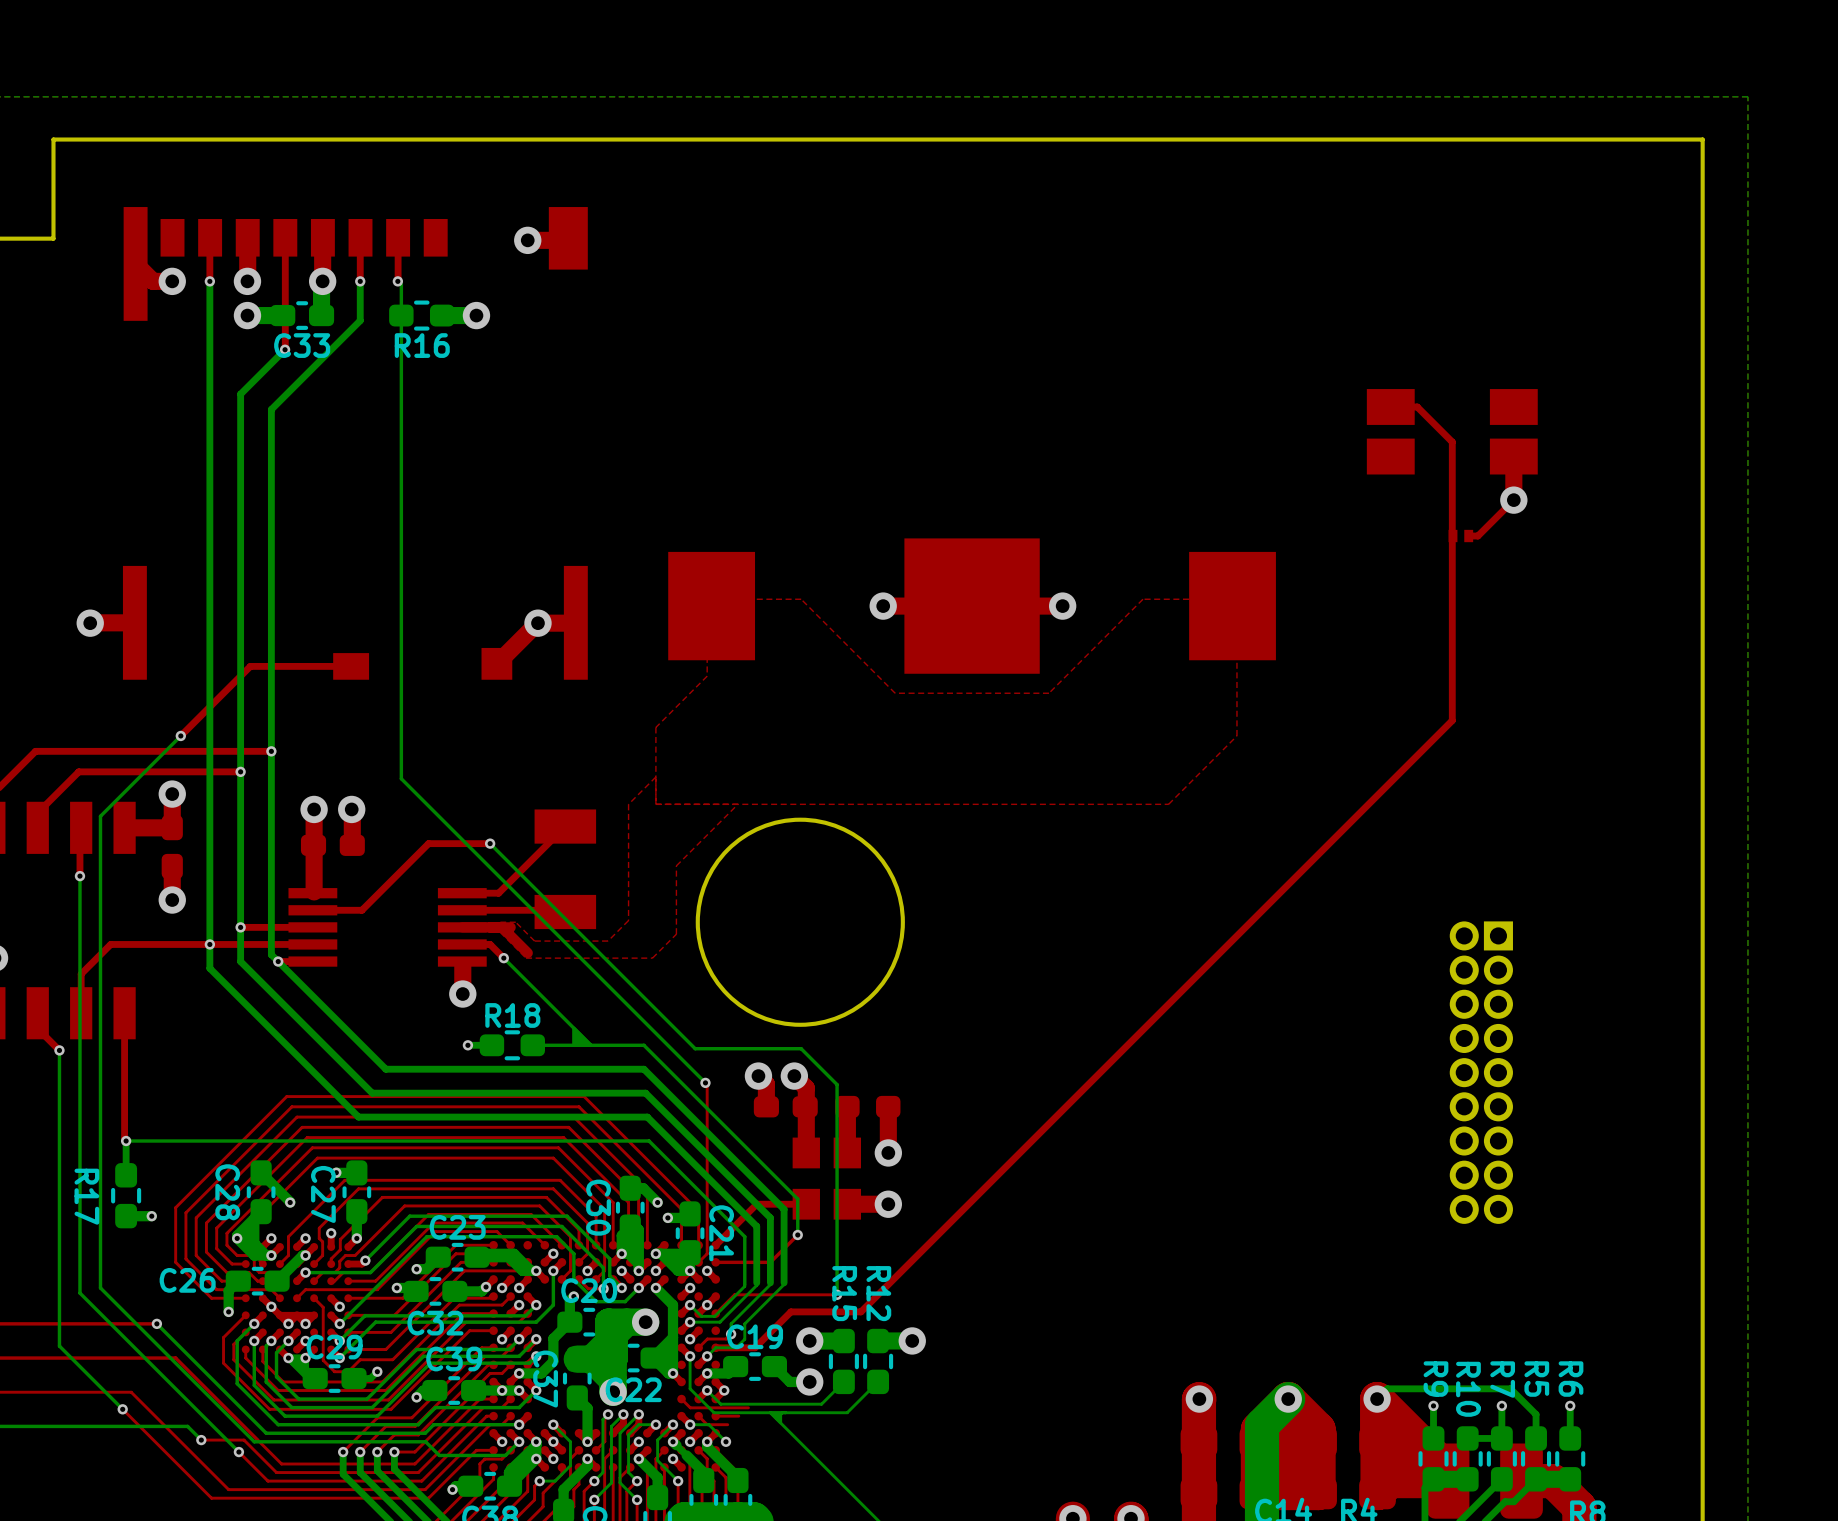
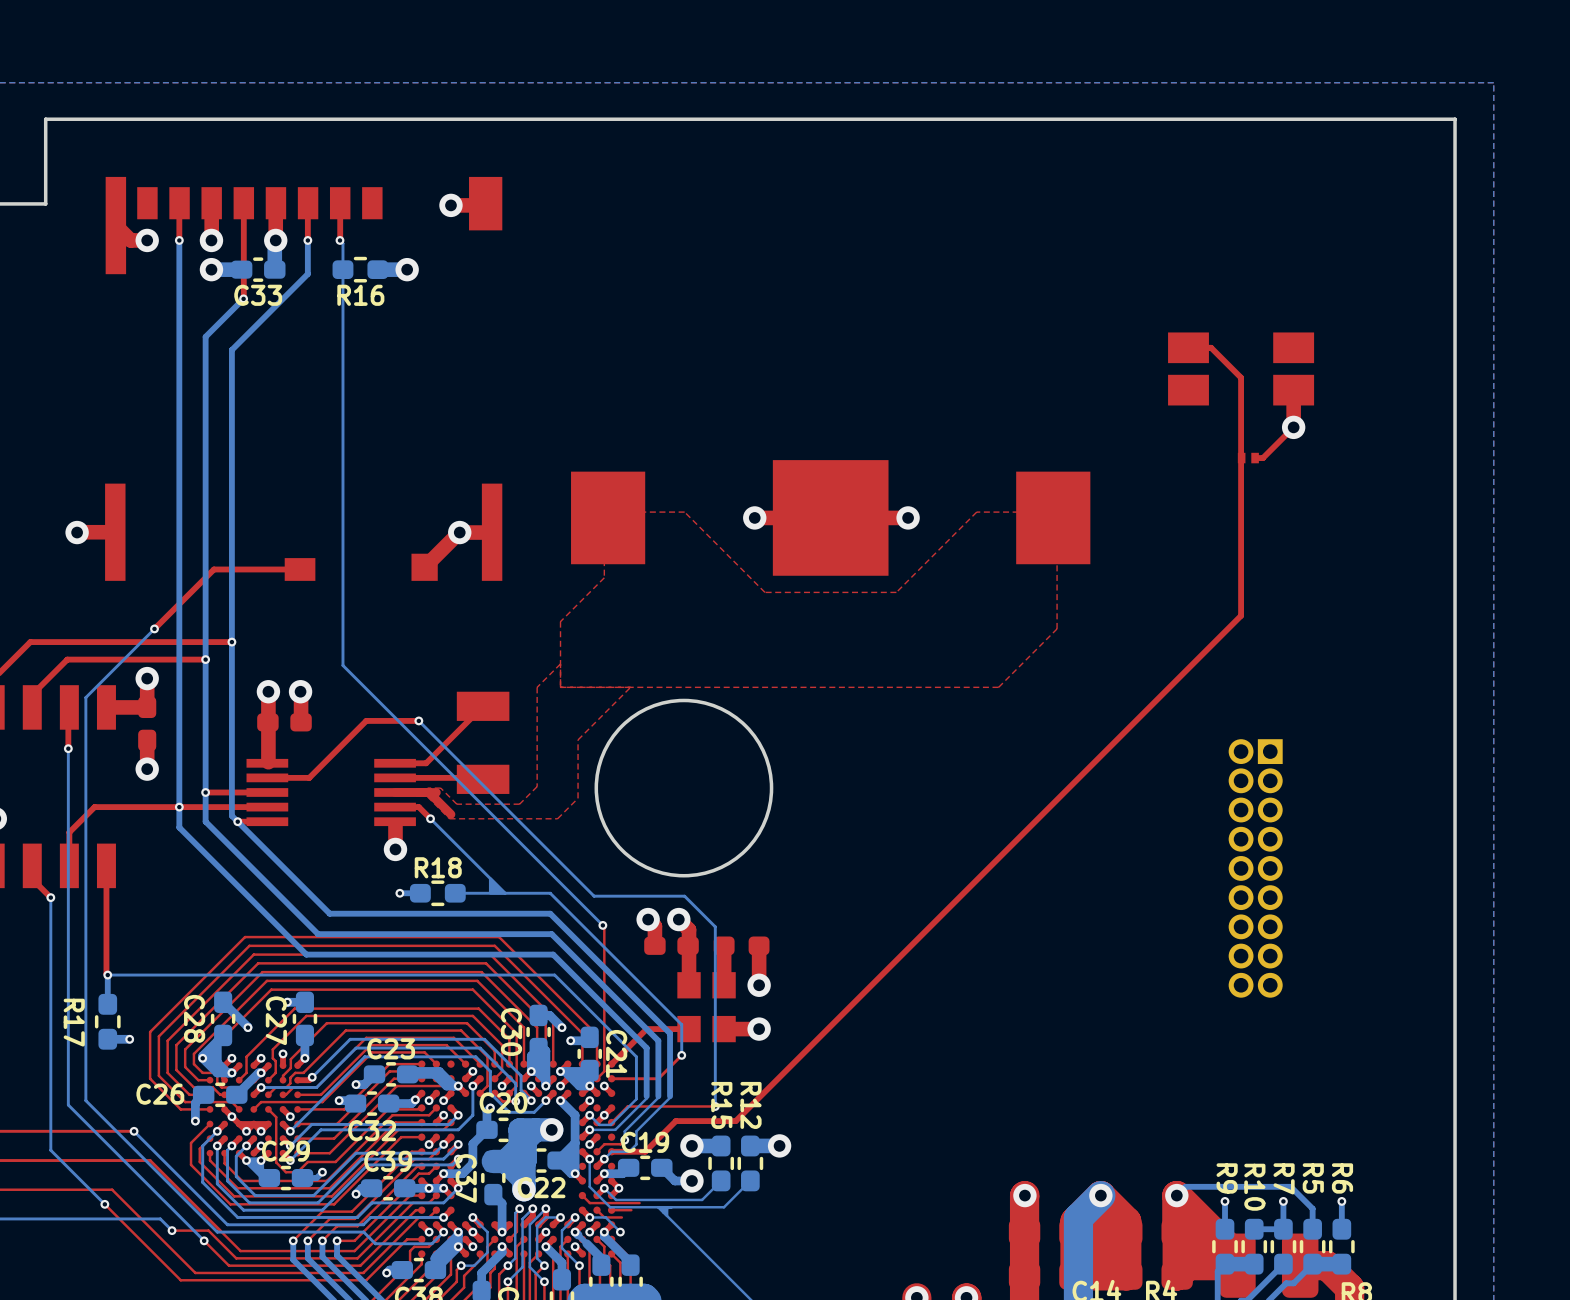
part position: (1481, 1072) -> (1255, 868)

